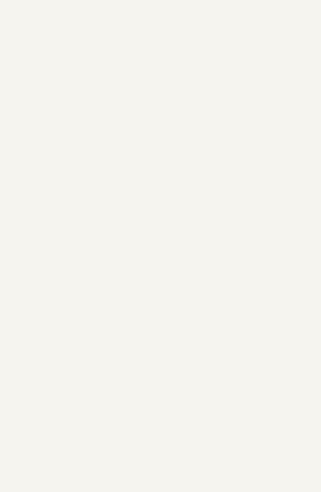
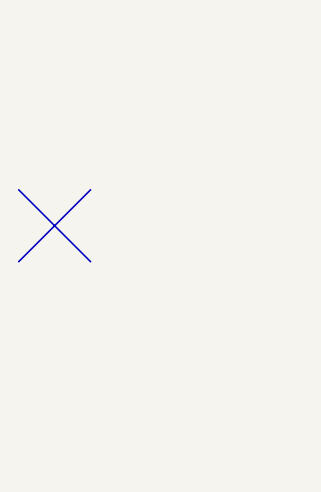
no-connect mark: none -> (54, 225)

